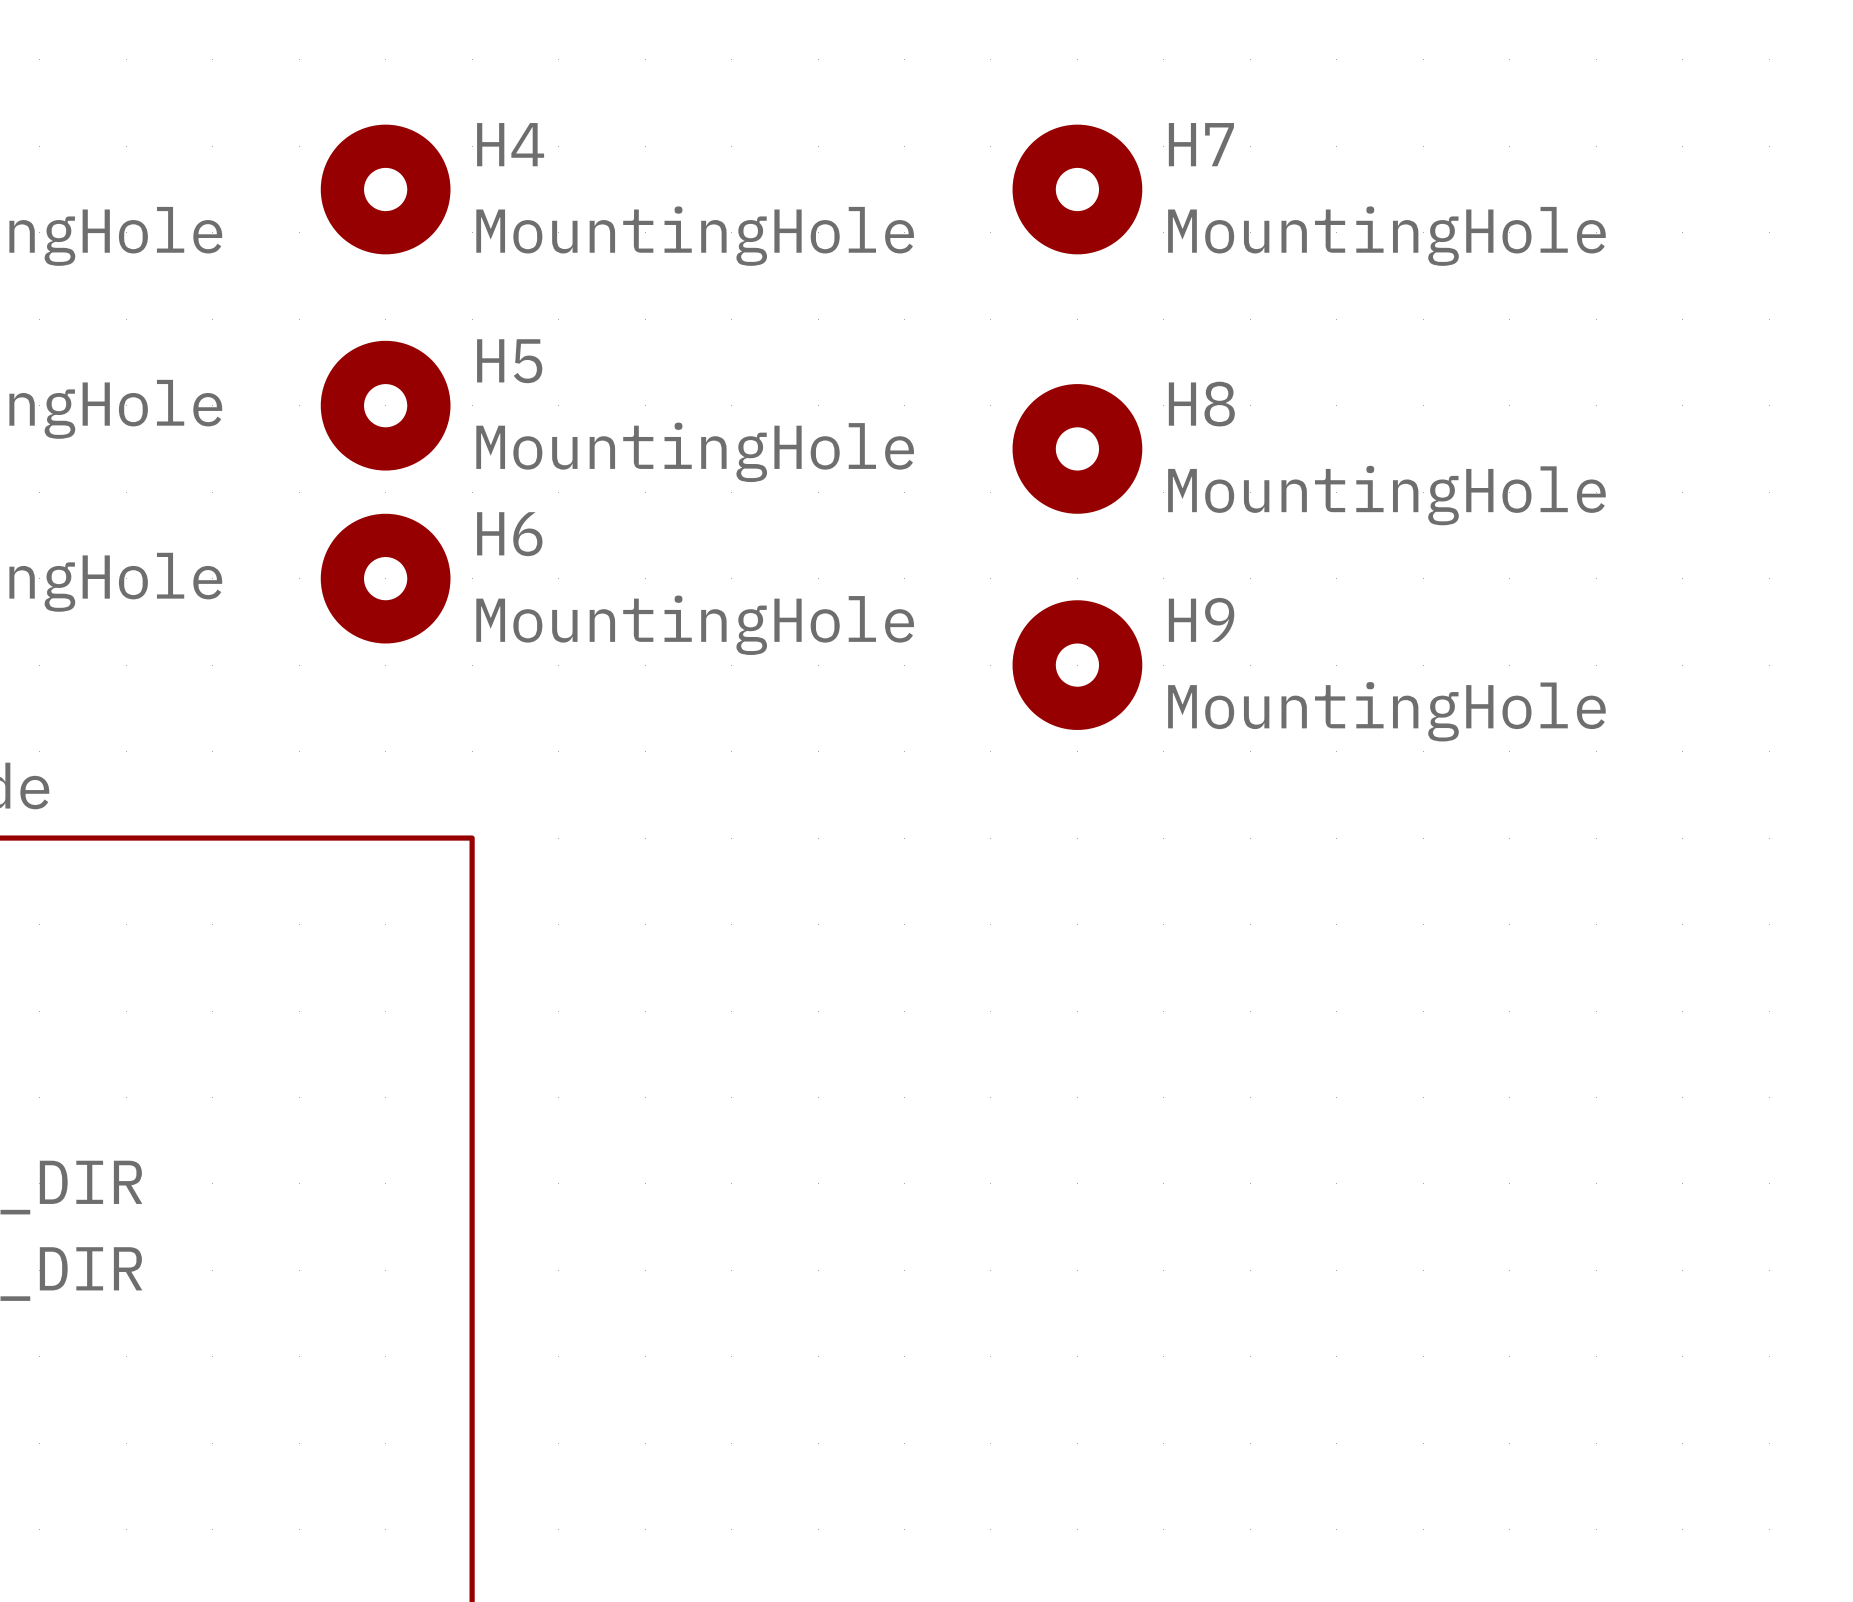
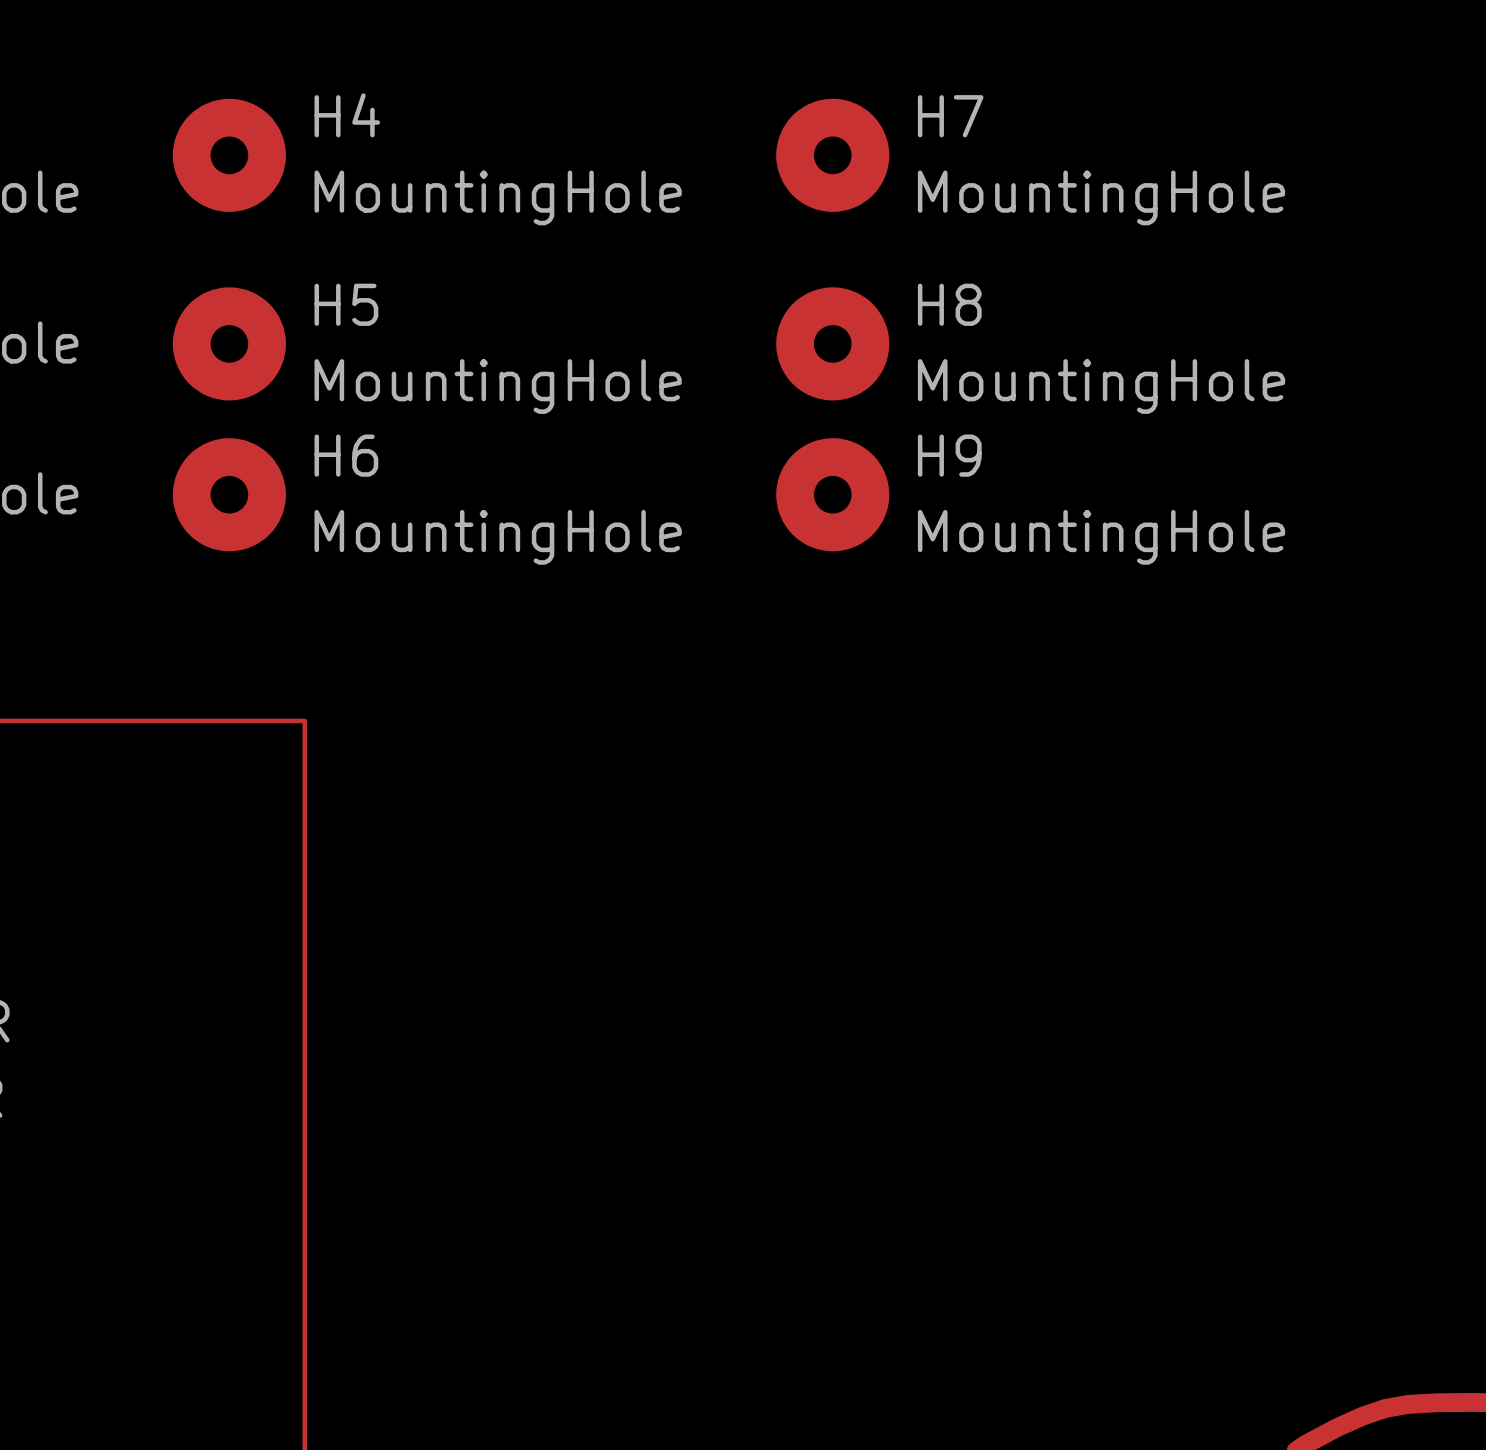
H8 position: (1077, 448) -> (832, 343)
H9 position: (1077, 665) -> (832, 494)

